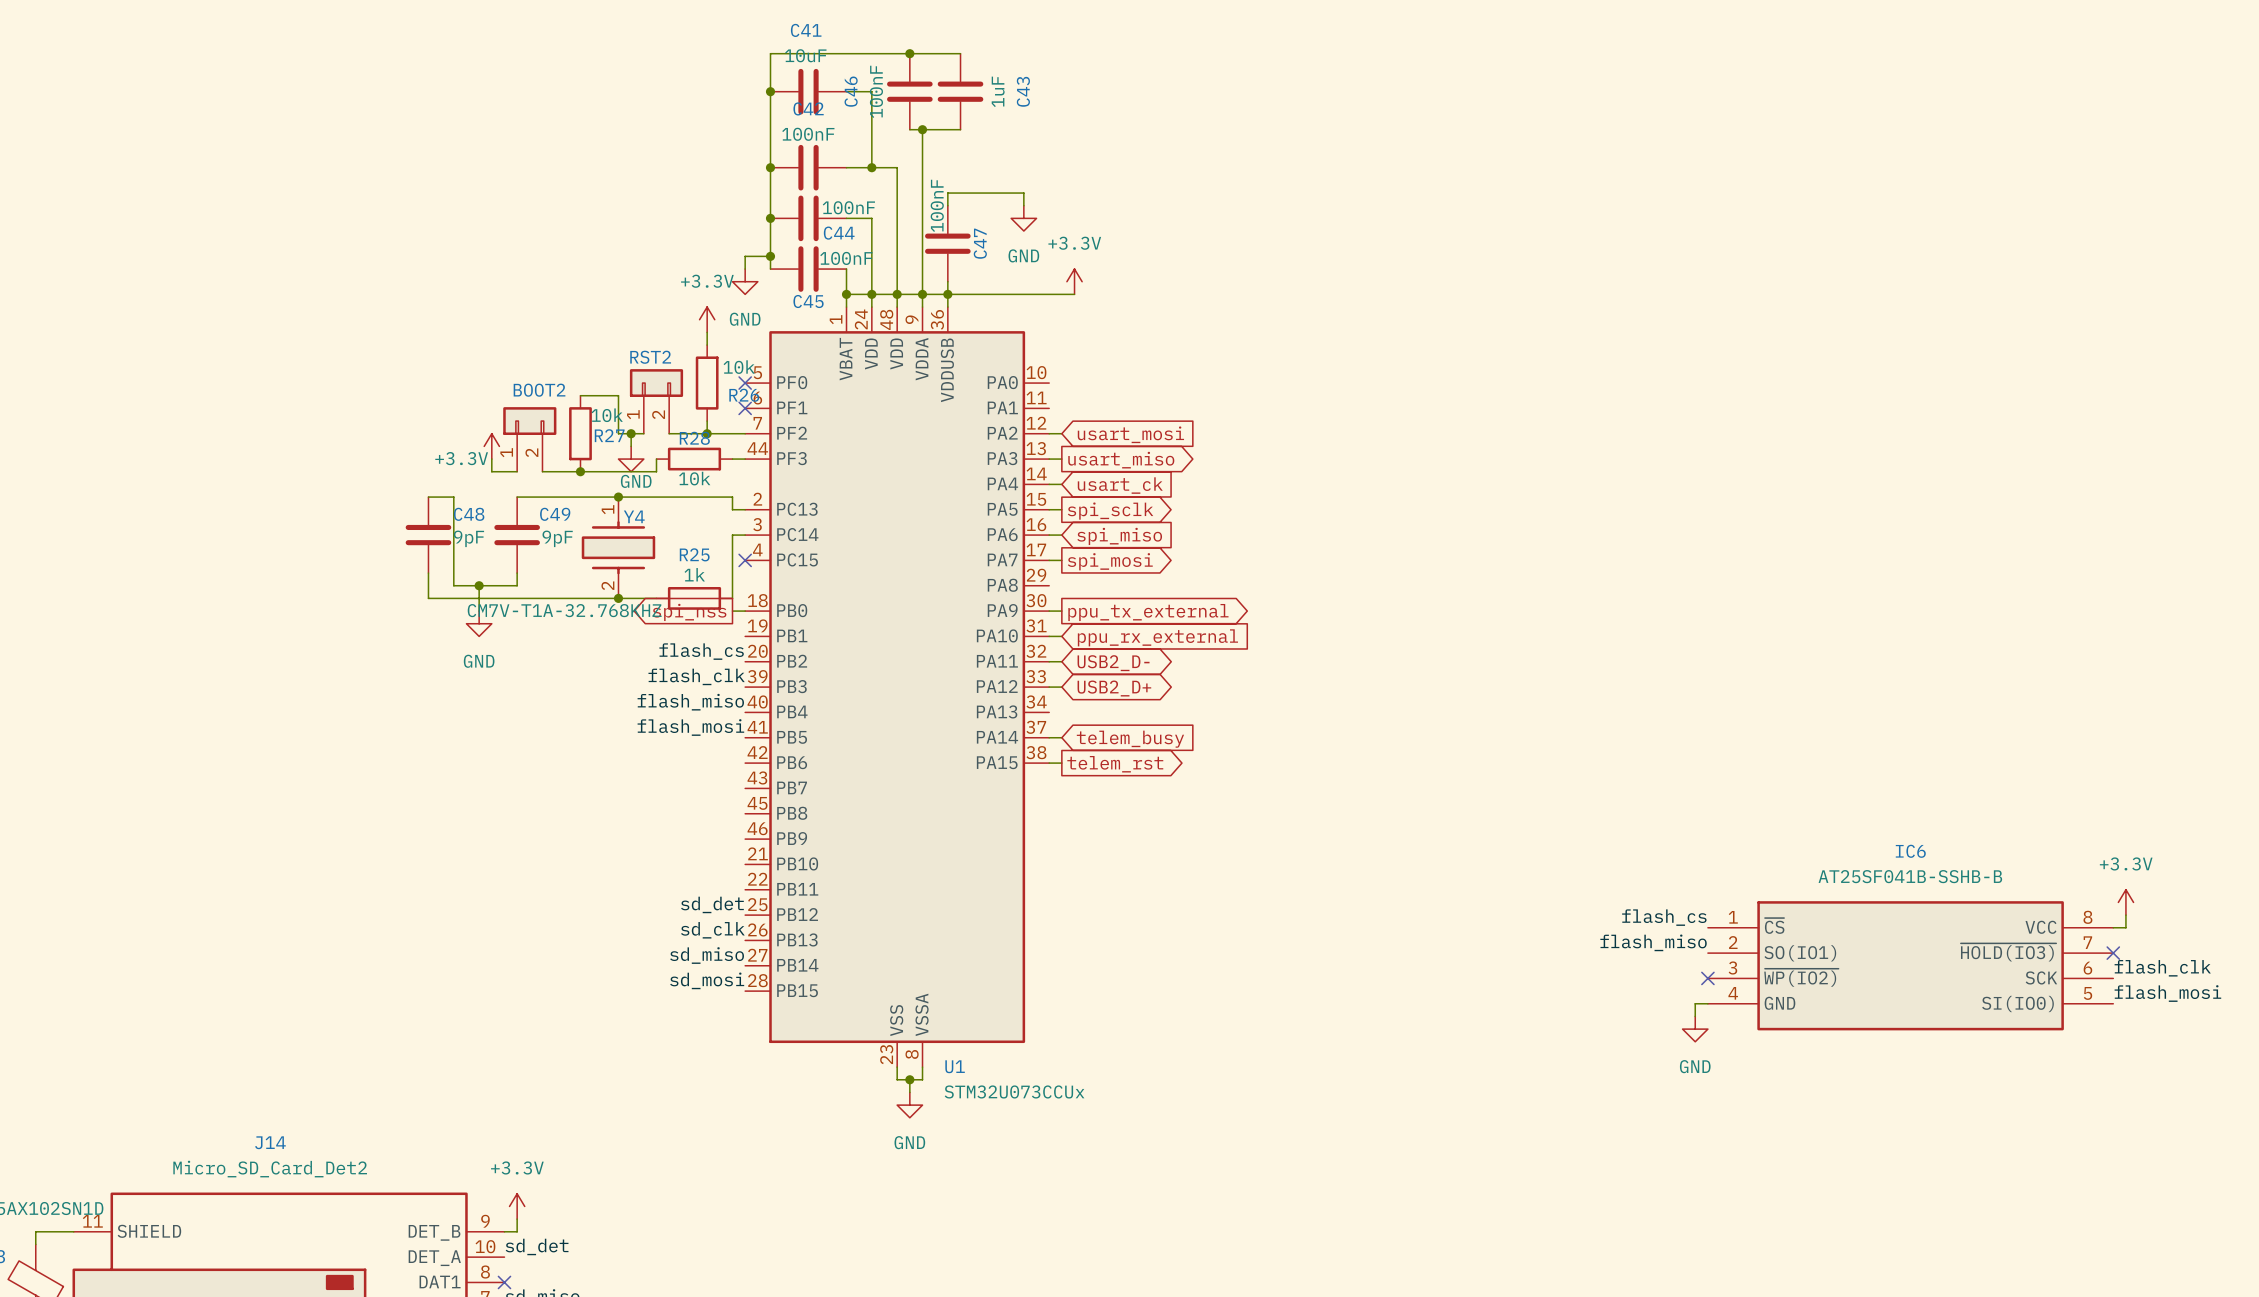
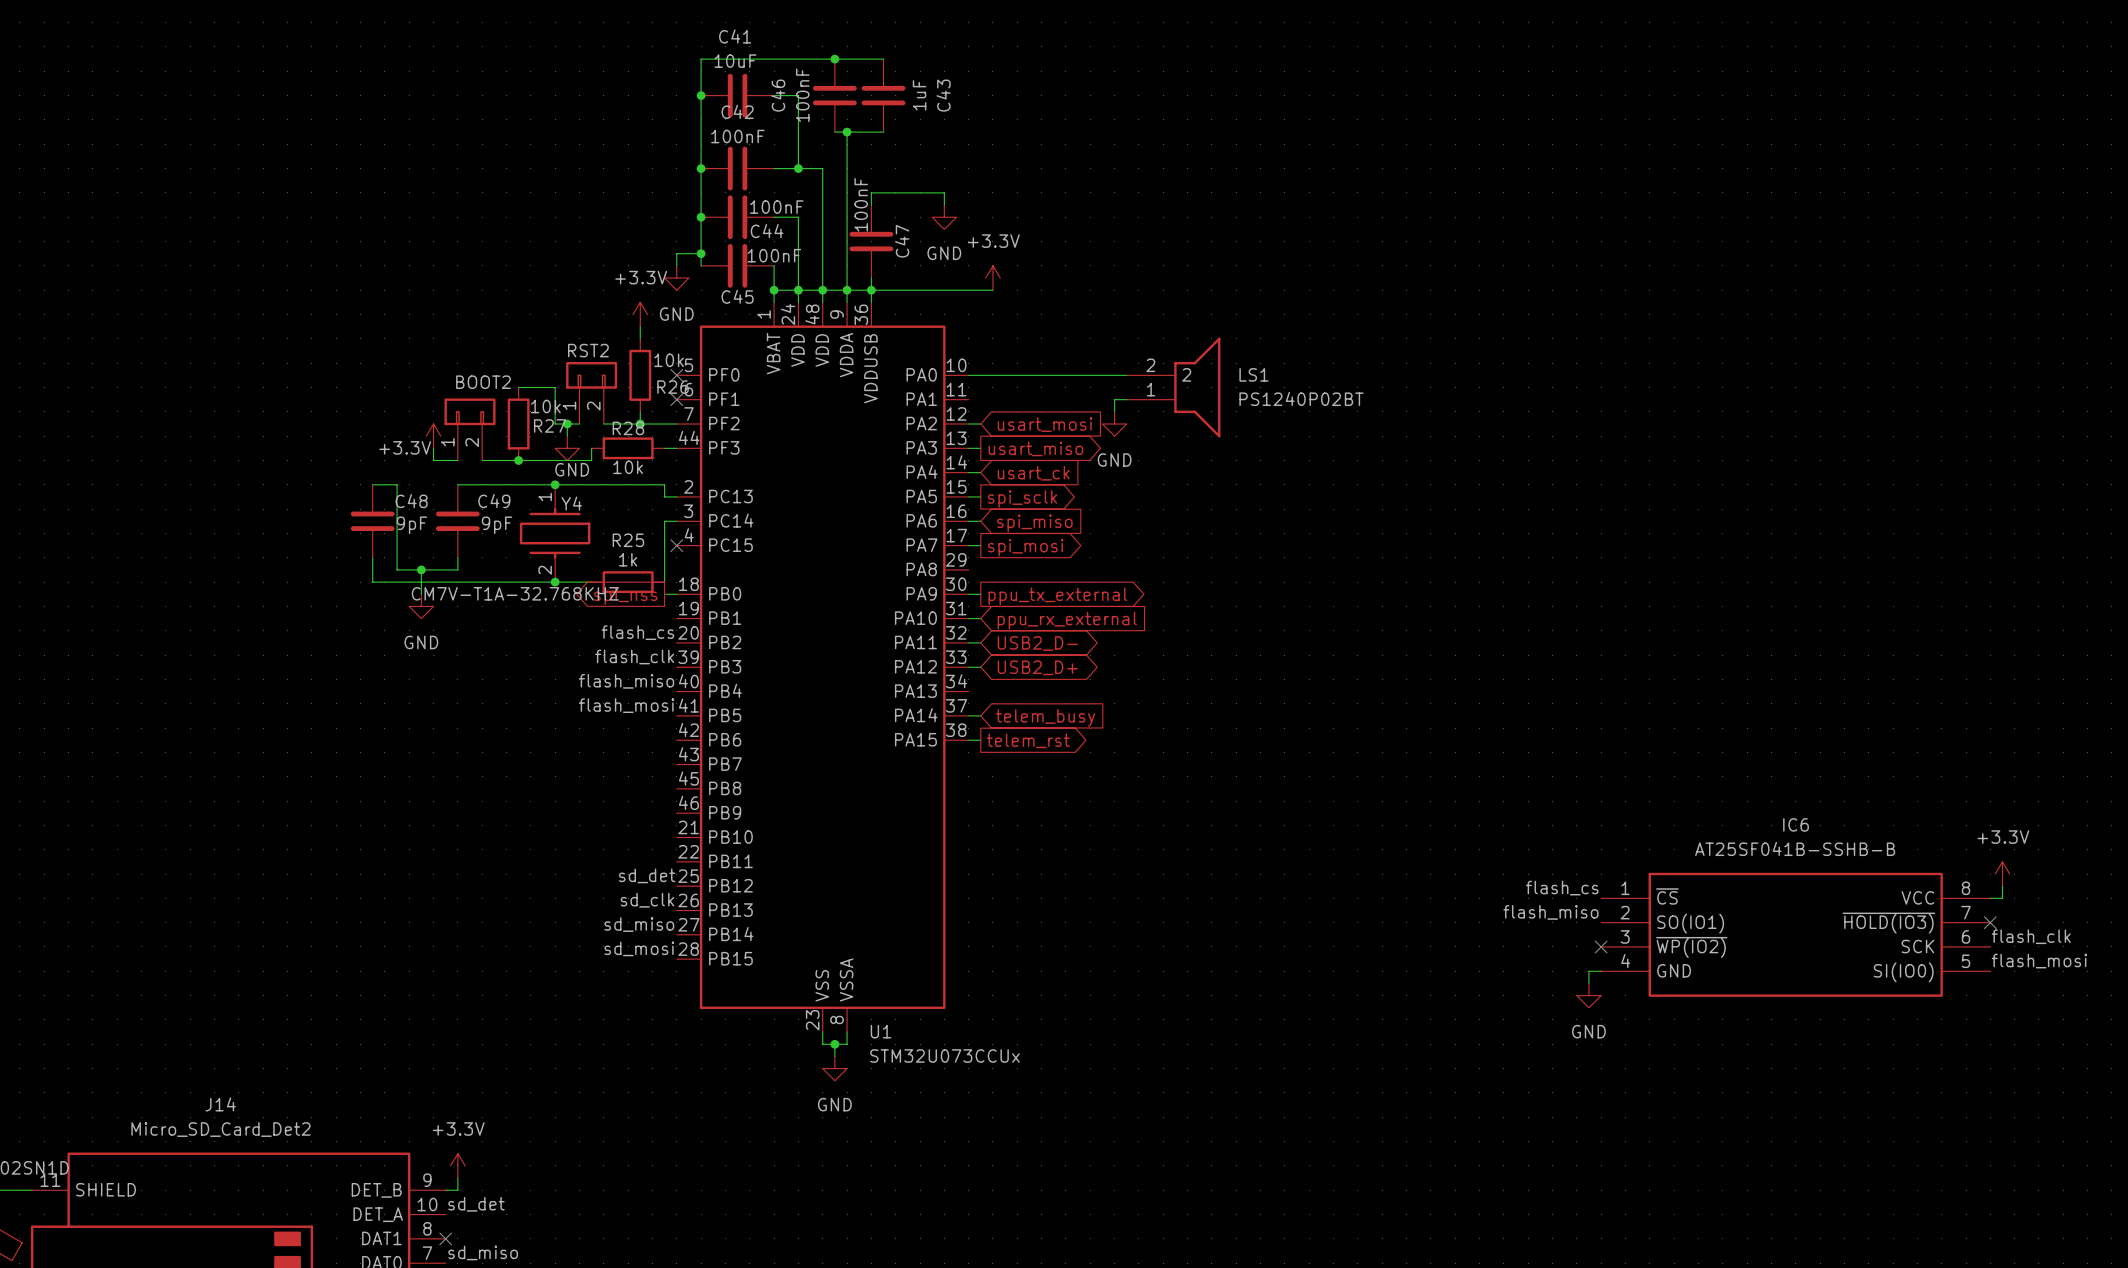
wire: none -> (968, 375) (1126, 375)
LS1: none -> PS1240P02BT (1173, 387)
wire: none -> (1126, 399) (1114, 399) (1114, 411)
power symbol: none -> GND (1114, 424)

